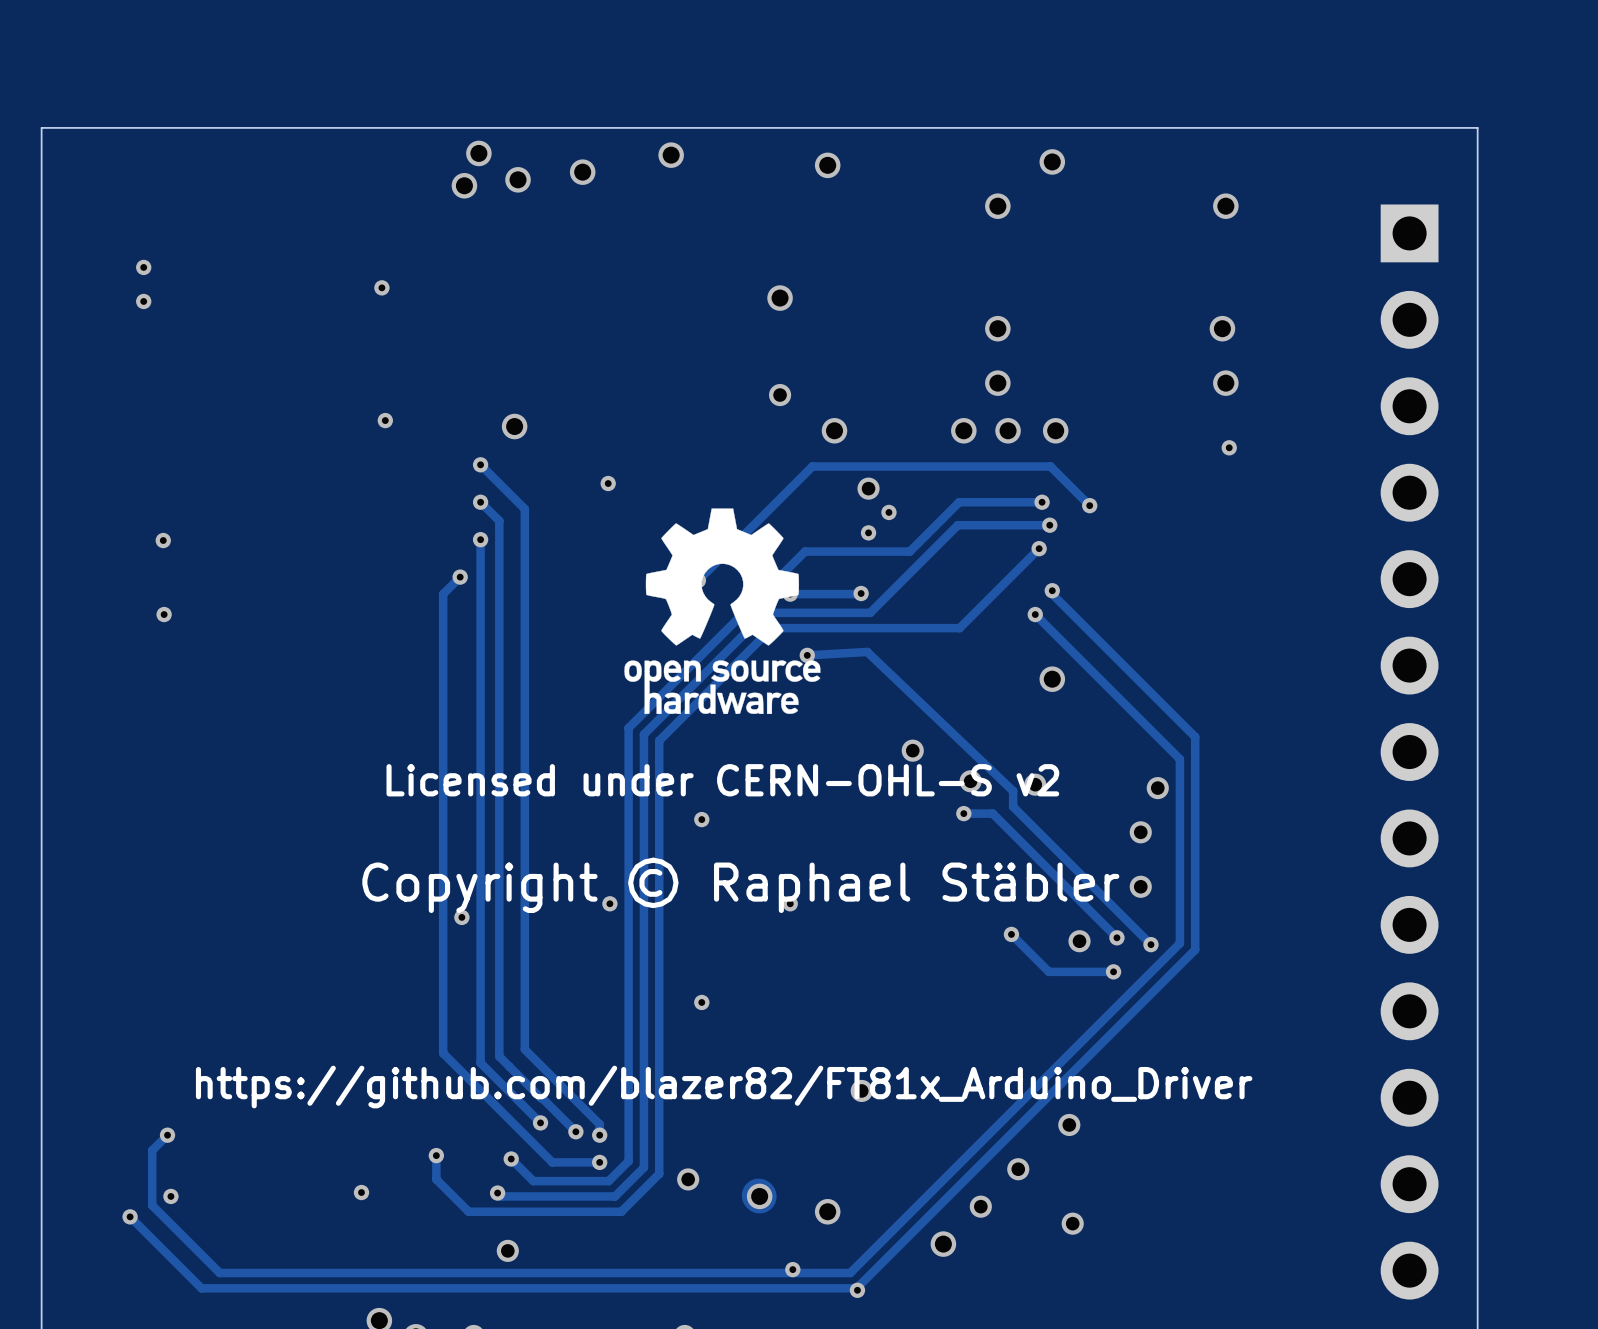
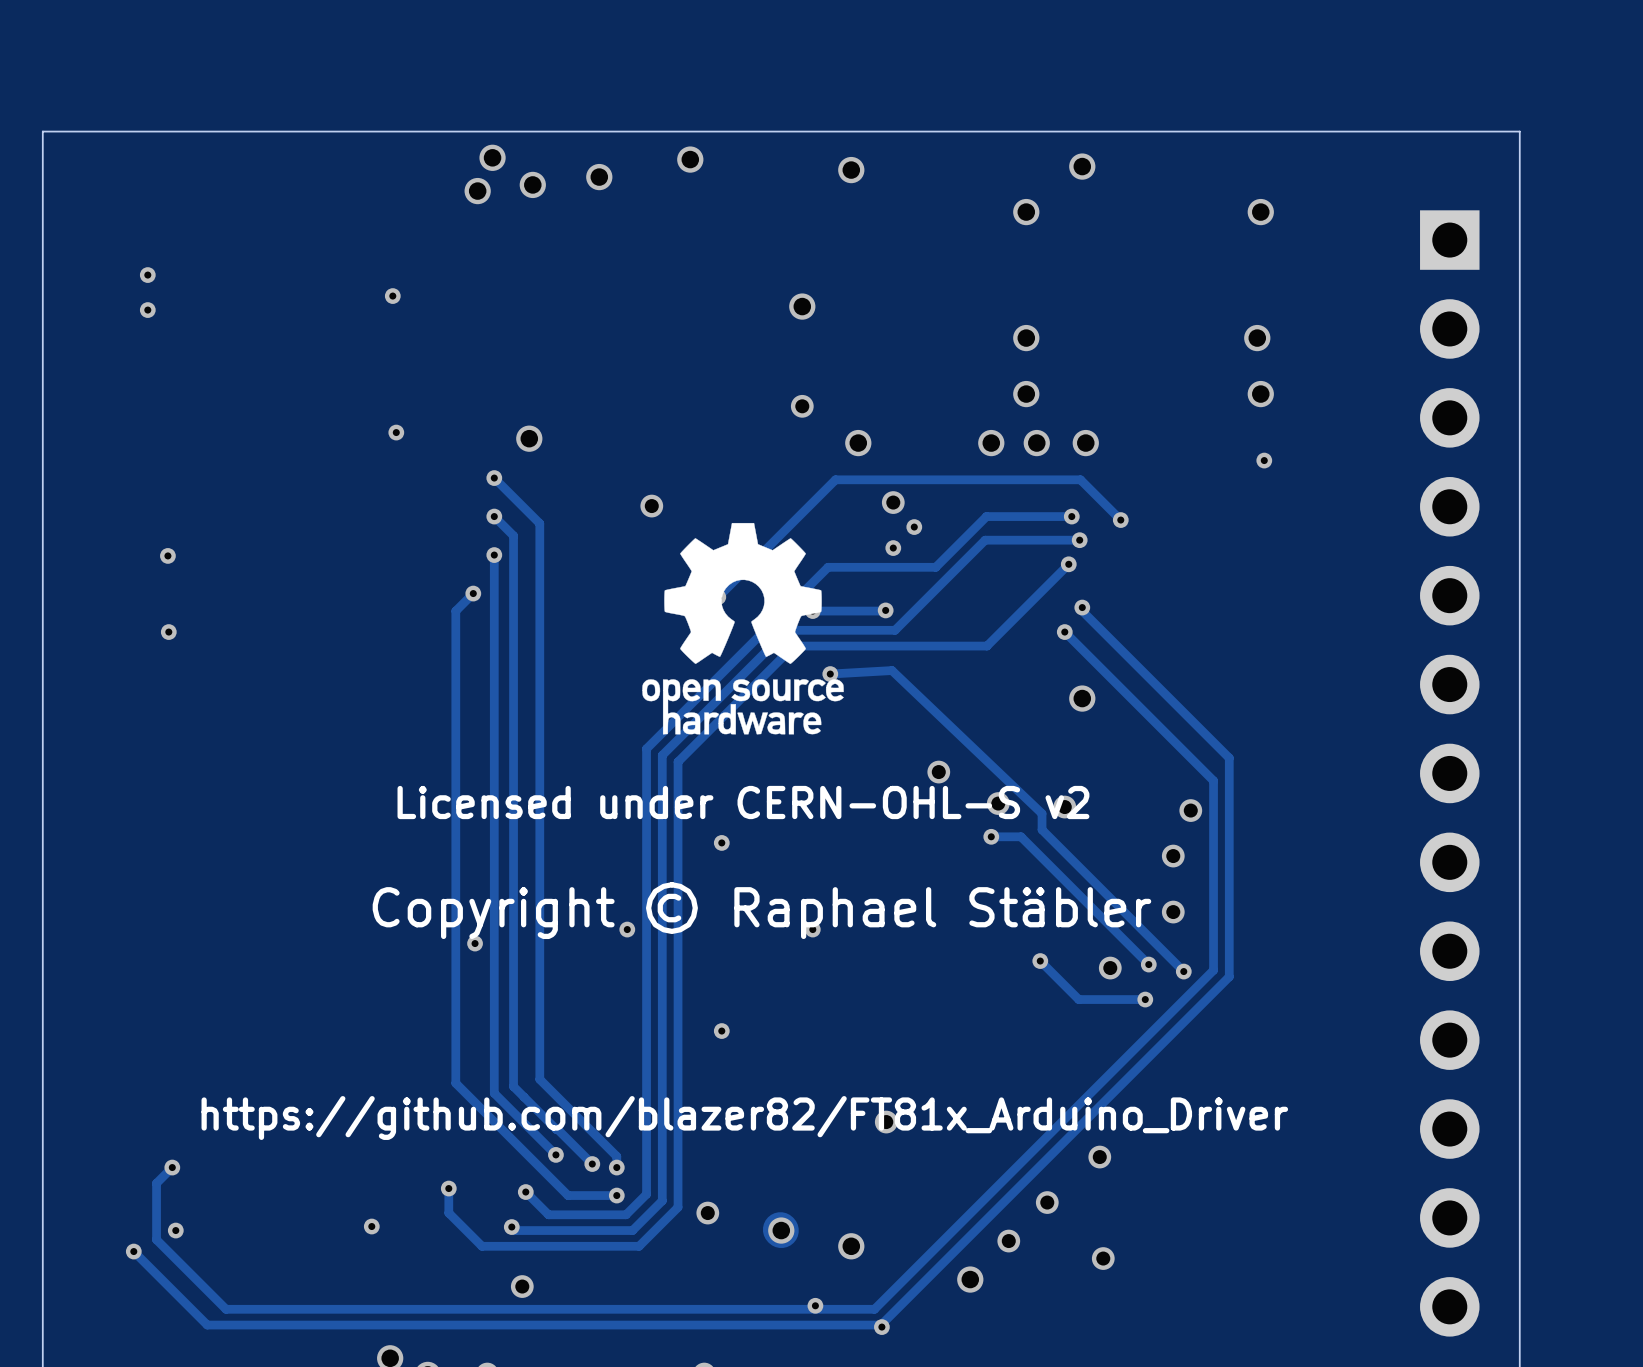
via: (608, 483) -> none
via: none -> (651, 506)

